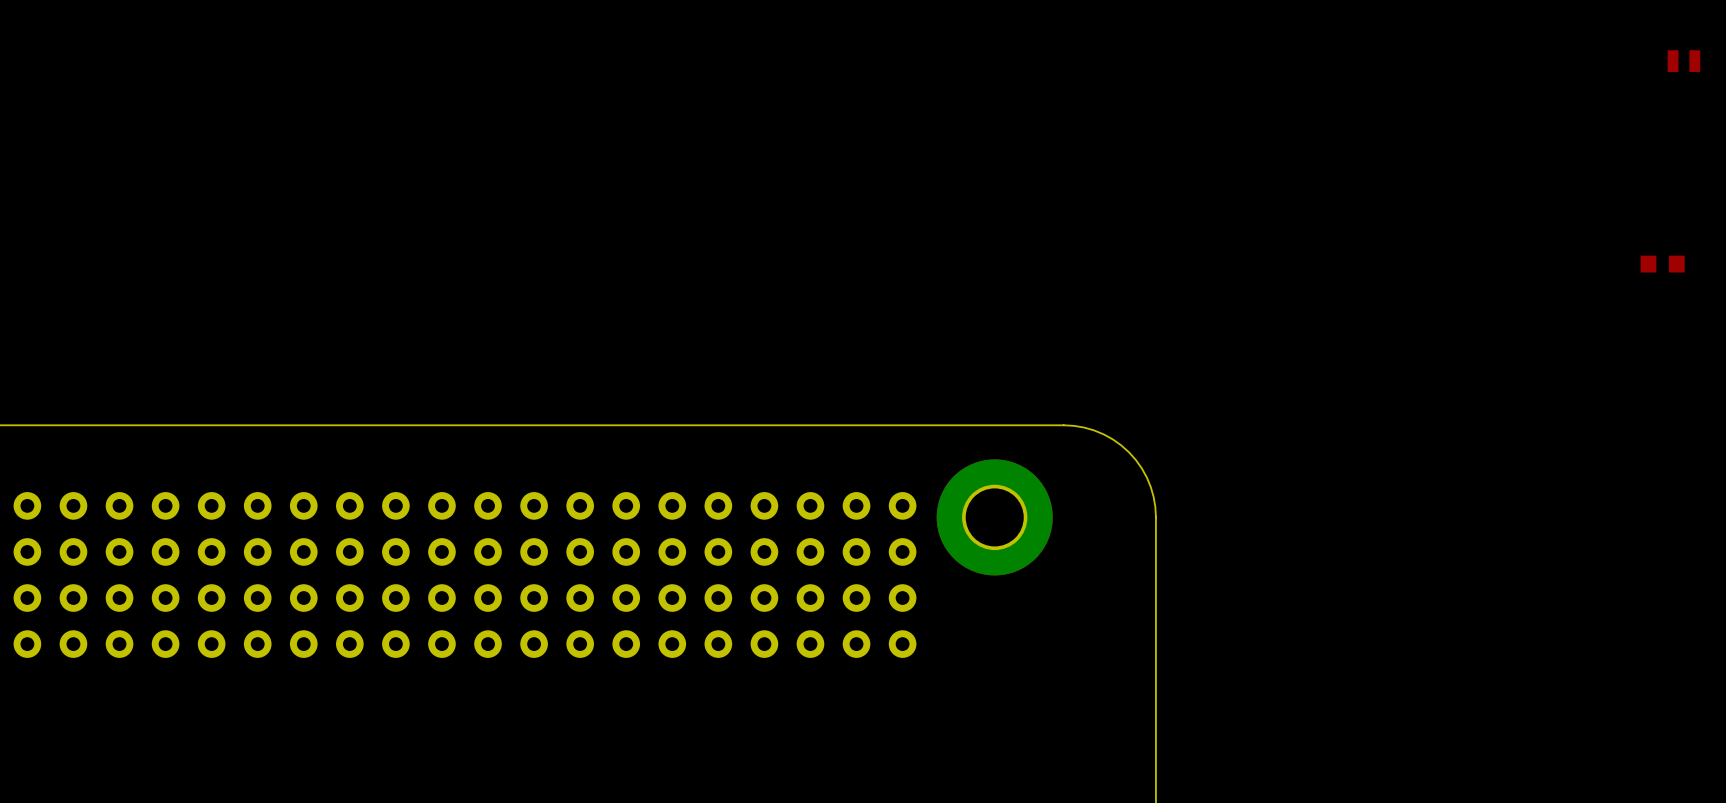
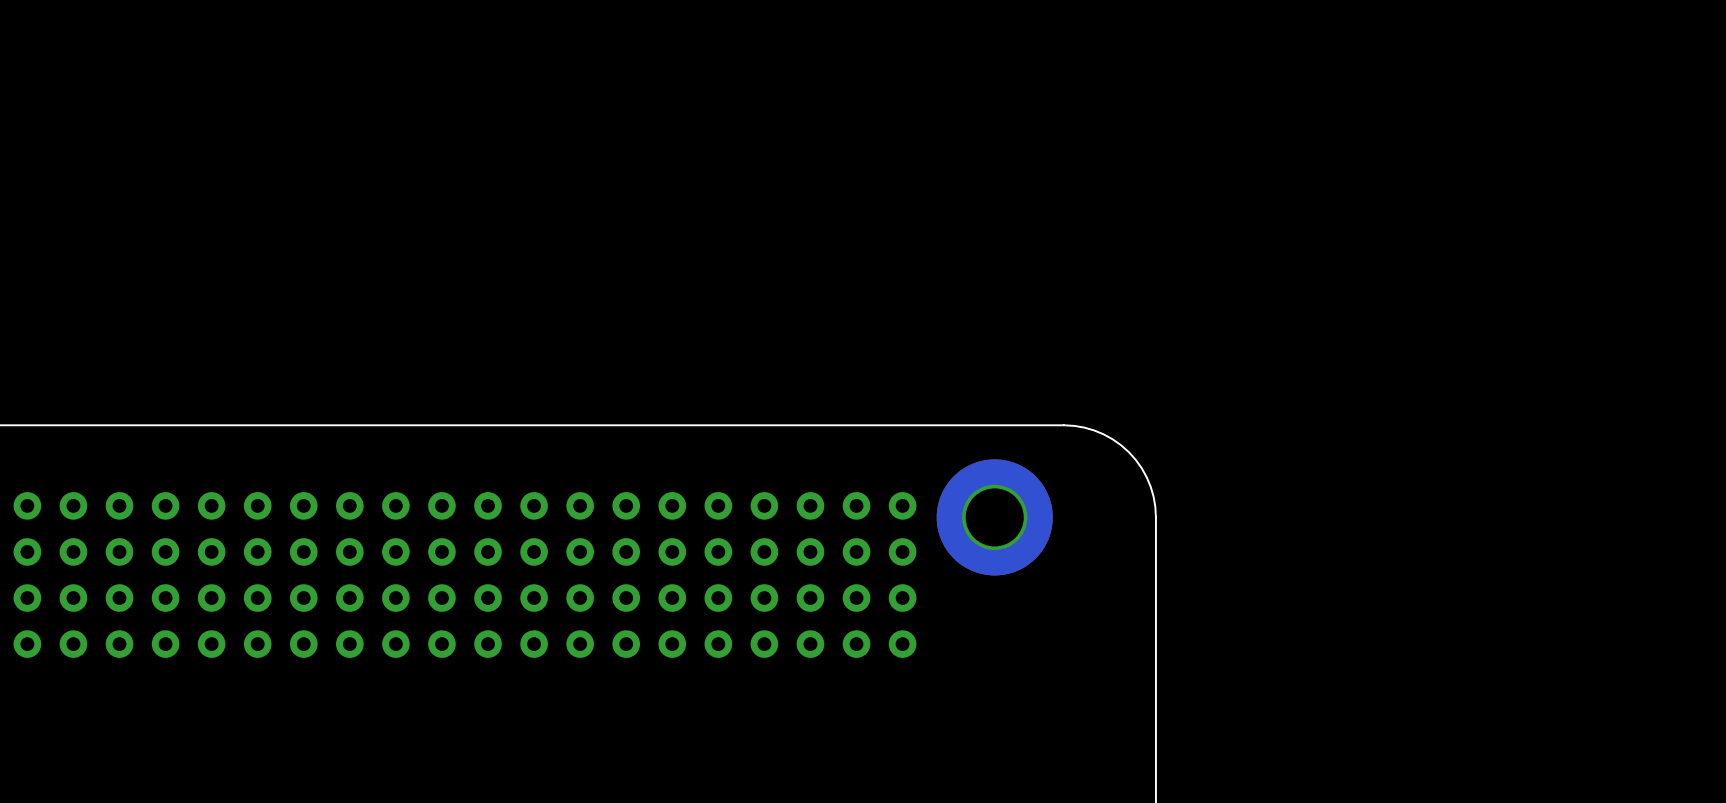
part: (1683, 61) -> none
part: (1662, 264) -> none

